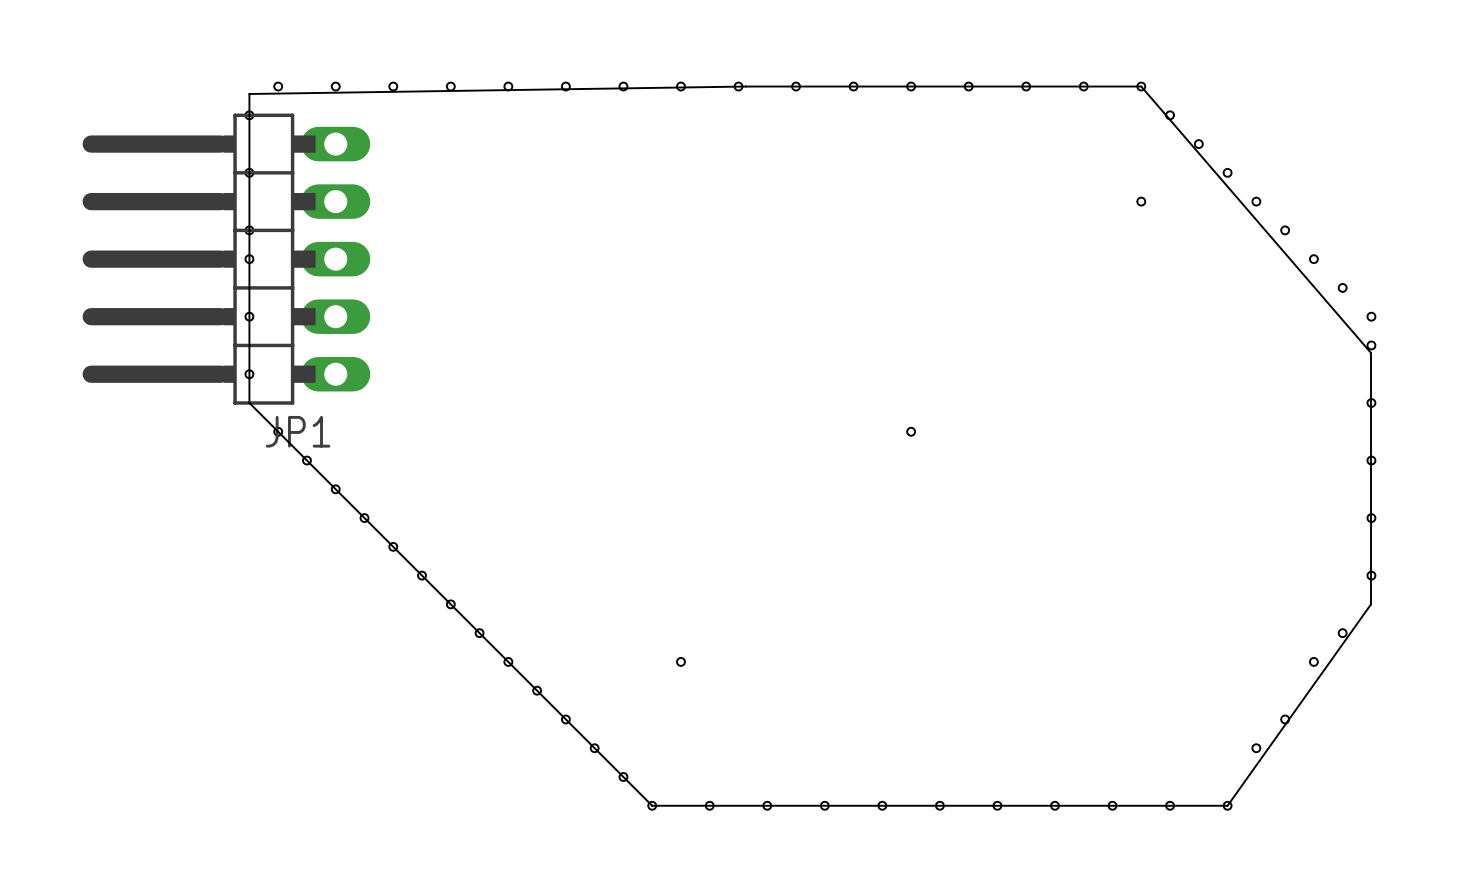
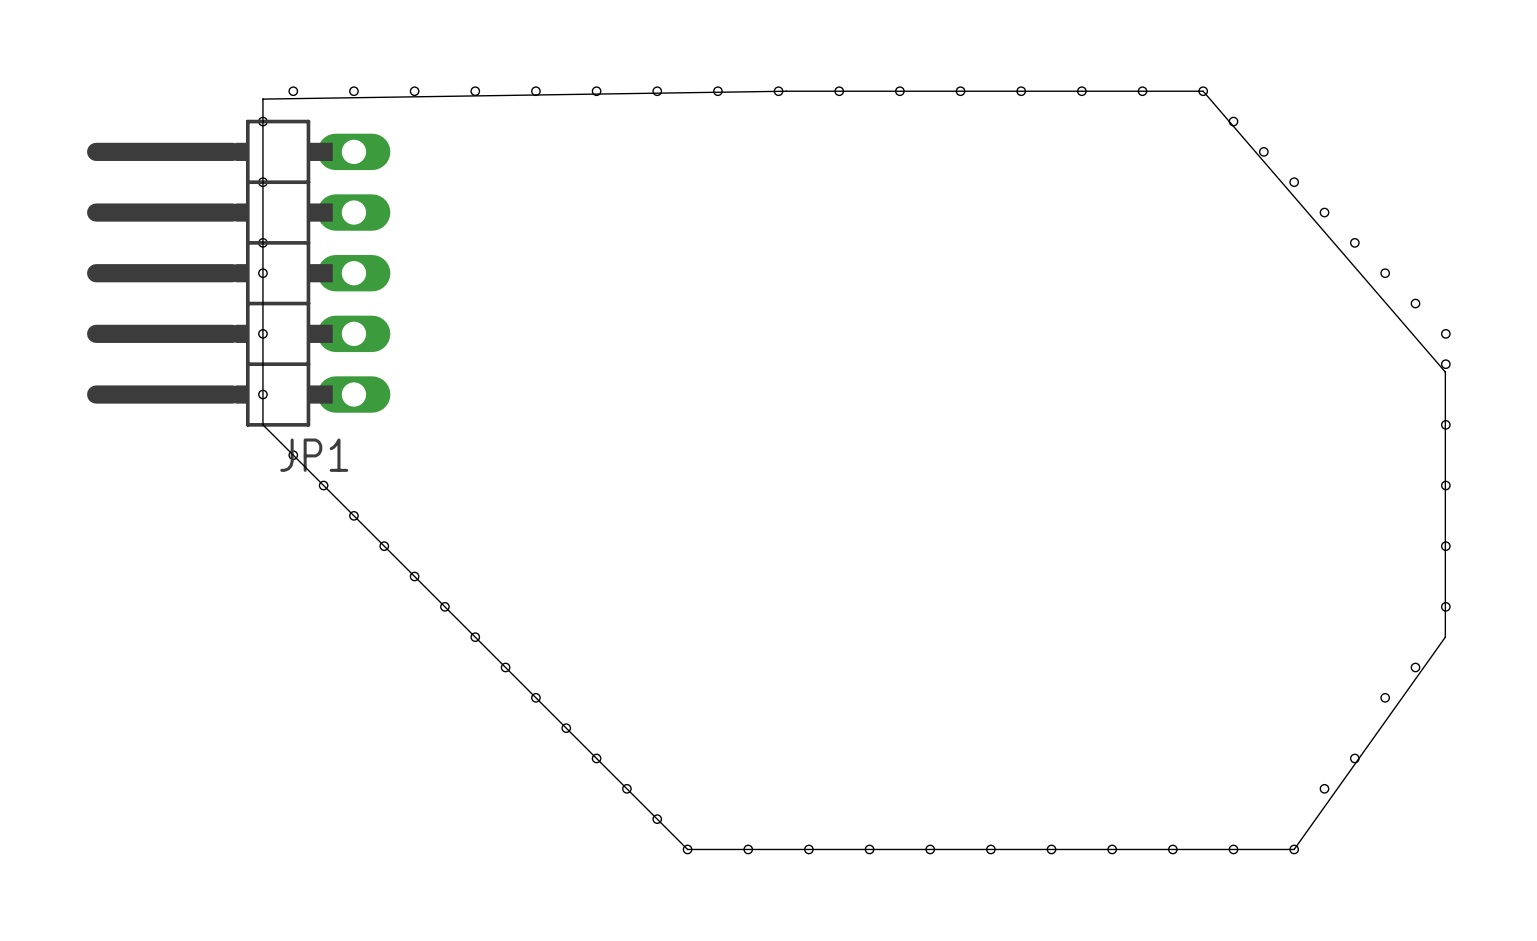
hole: (1141, 201) -> none
hole: (911, 431) -> none
hole: (680, 661) -> none

